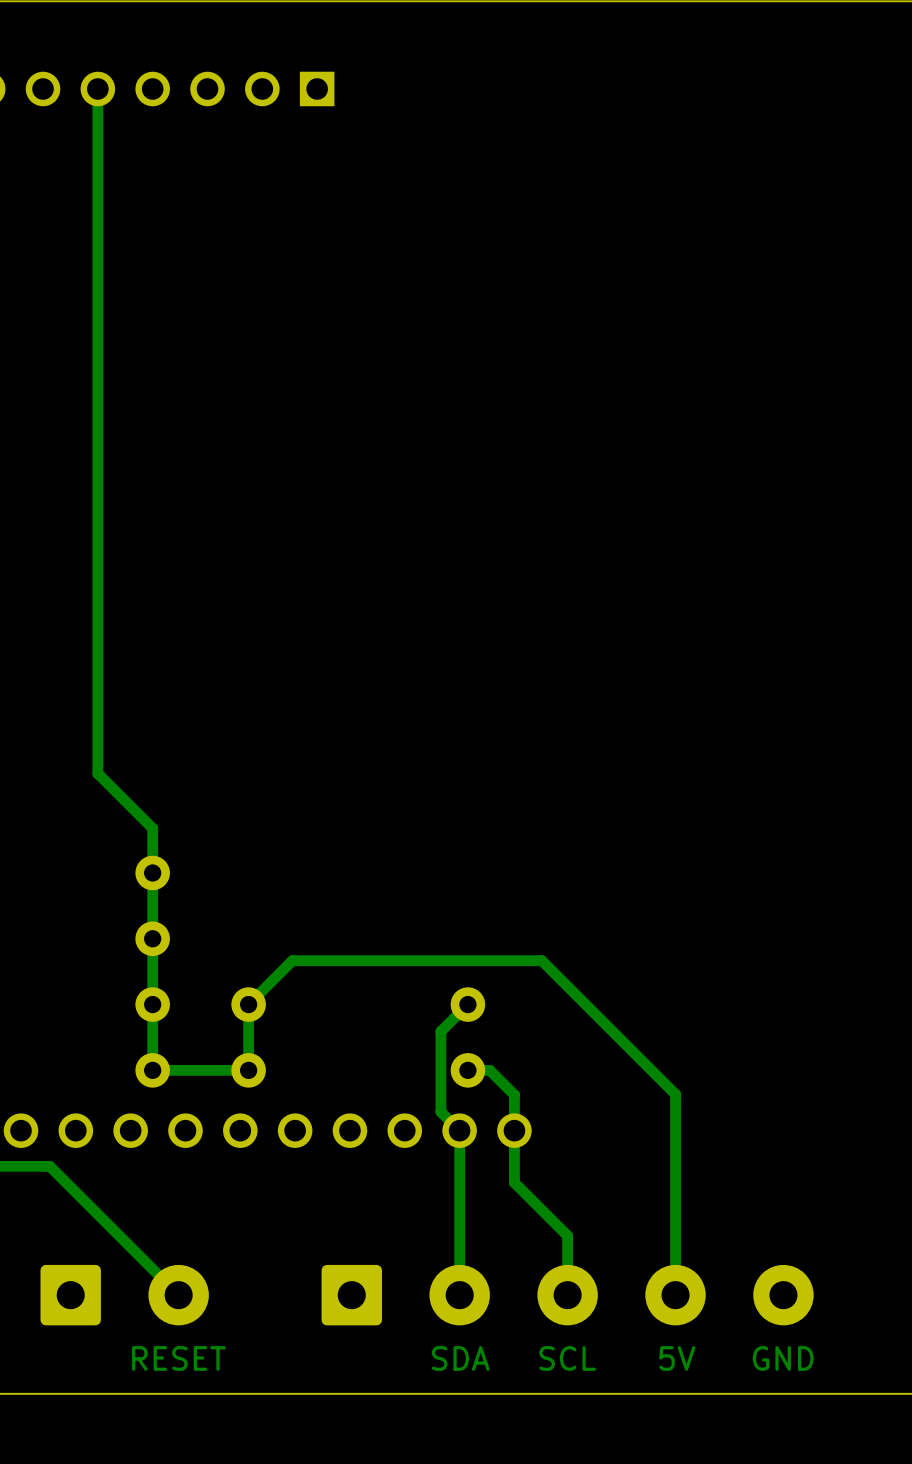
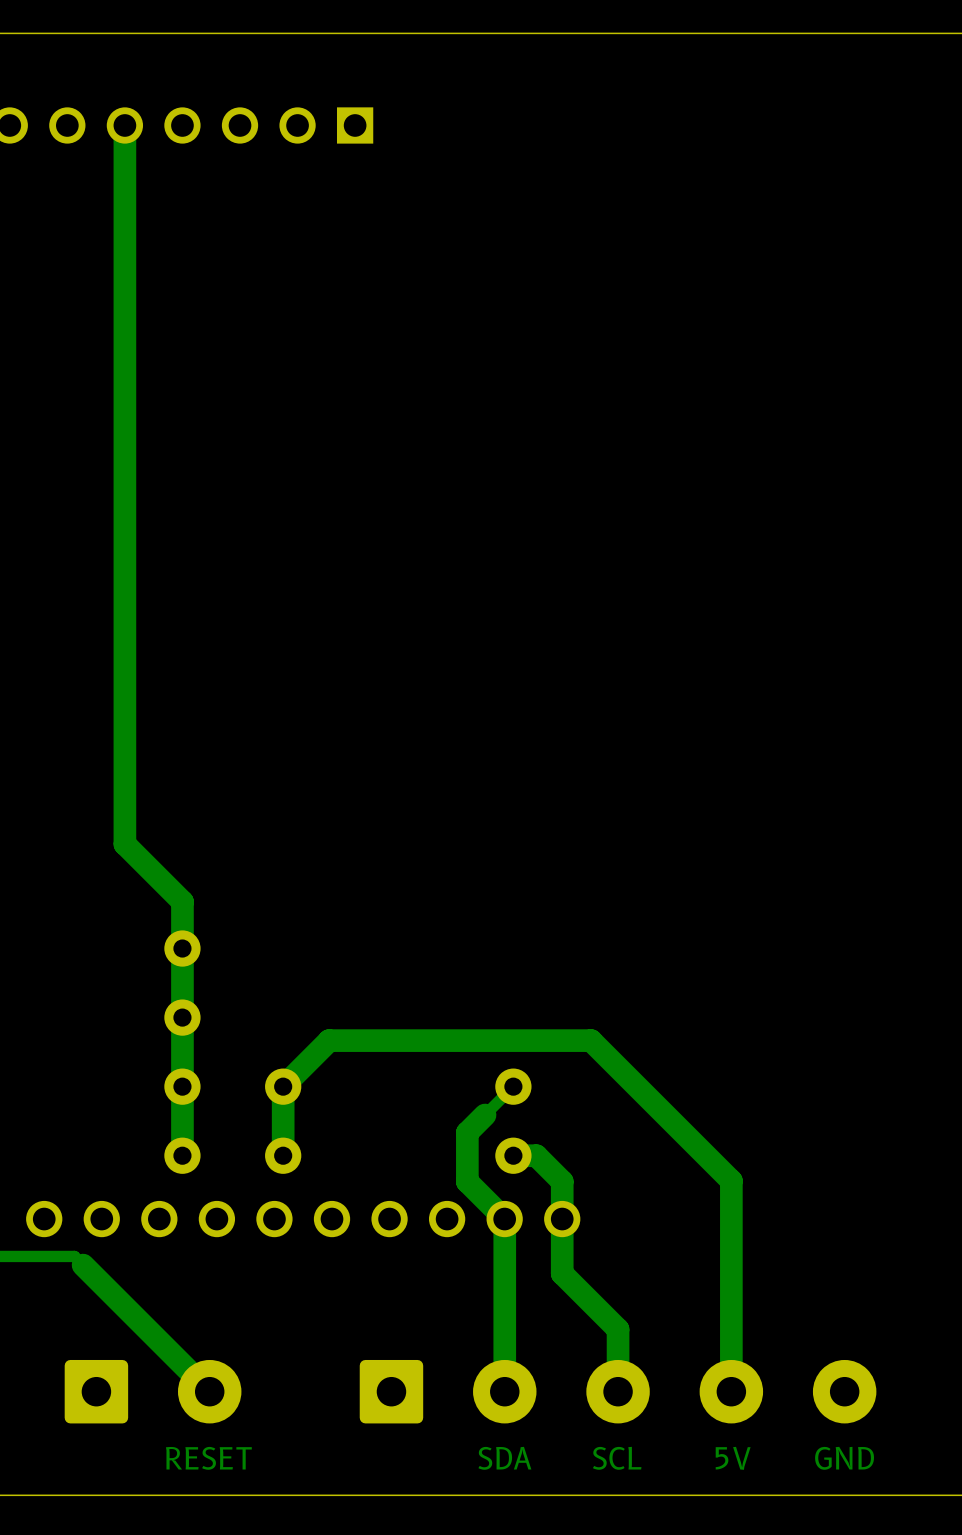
bottom track width: thin (97, 88) (97, 773) (152, 828) (152, 1070) -> thick (124, 125) (124, 844) (182, 901) (182, 1155)
bottom track: (440, 1031) (440, 1111) -> (485, 1115) (467, 1132) (467, 1181) (485, 1199)
bottom track: (248, 1070) (152, 1070) -> none
bottom track width: thin (248, 1070) (248, 1004) (292, 960) (541, 960) (675, 1094) (675, 1295) -> thick (283, 1155) (283, 1086) (329, 1040) (591, 1040) (731, 1180) (731, 1391)
bottom track width: thin (467, 1070) (489, 1070) (514, 1094) (514, 1182) (567, 1235) (567, 1292) (563, 1295) -> thick (513, 1155) (536, 1155) (562, 1181) (562, 1273) (618, 1329) (618, 1388) (614, 1392)
bottom track width: thin (440, 1111) (459, 1130) (459, 1292) (455, 1295) -> thick (485, 1199) (504, 1219) (504, 1388) (500, 1392)
bottom track width: thin (58, 1174) (178, 1295) -> thick (83, 1265) (209, 1392)

